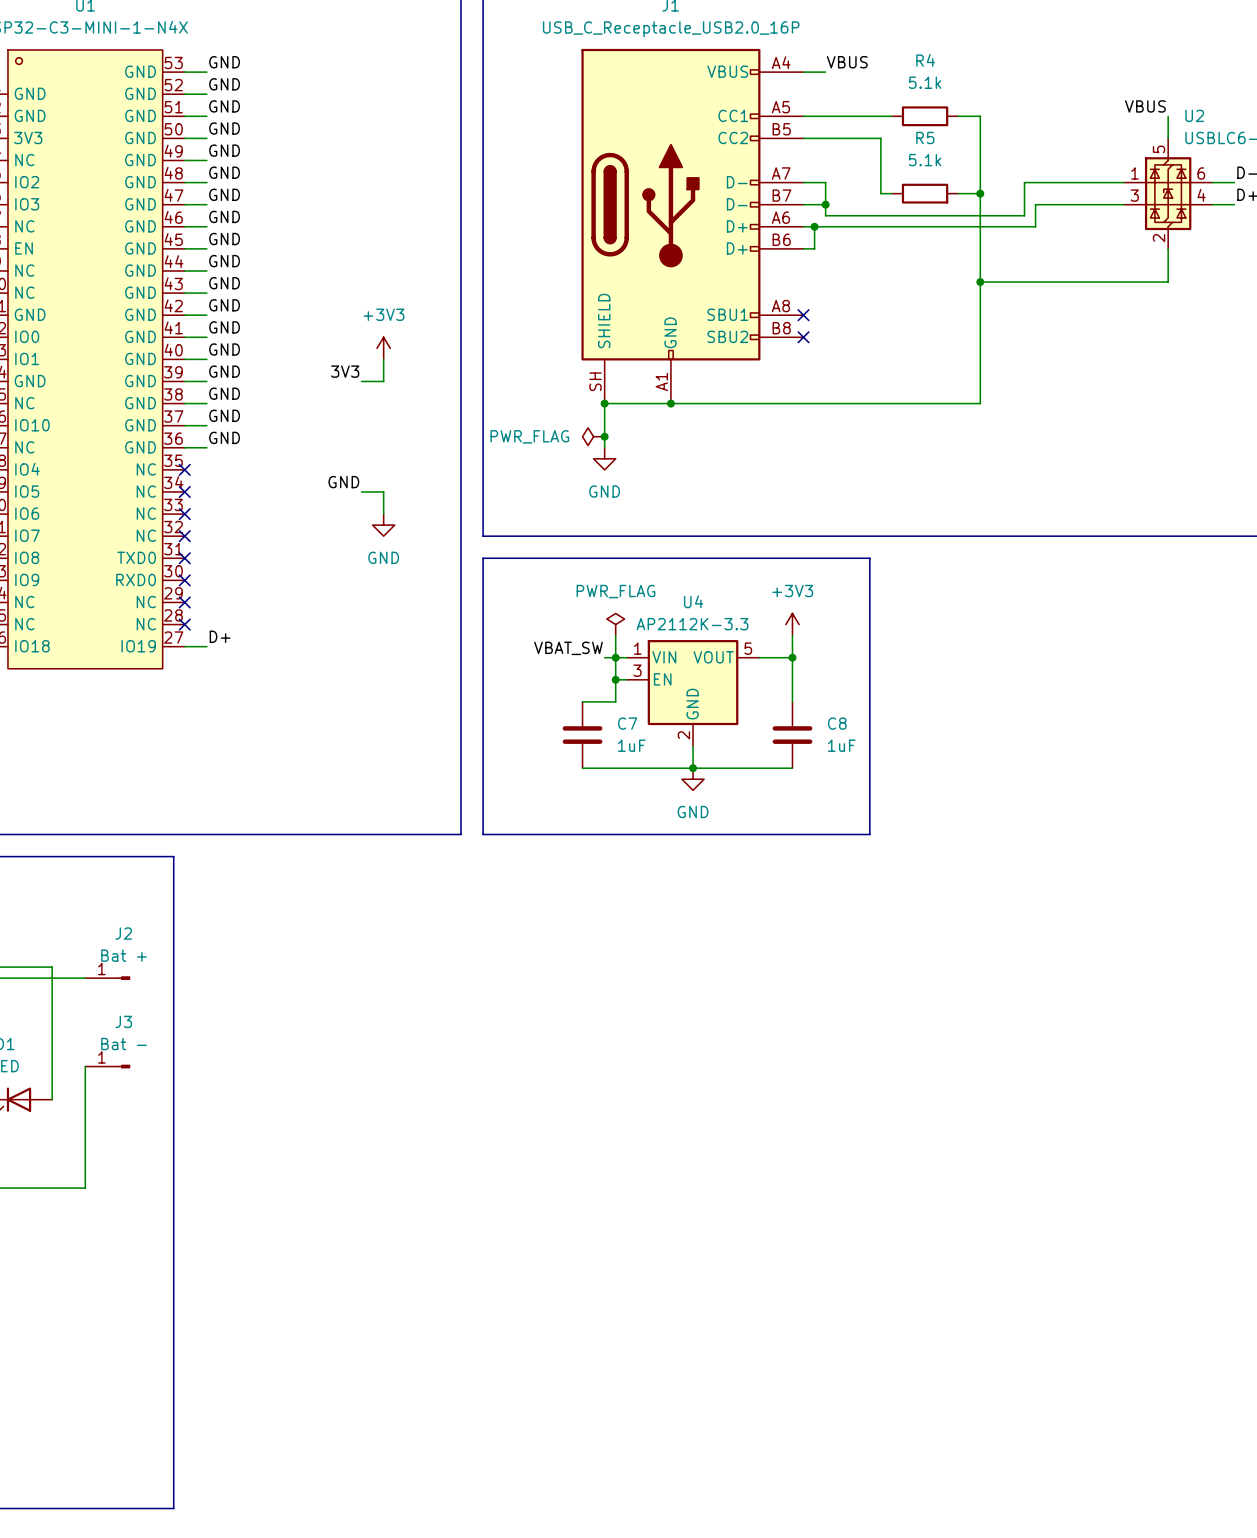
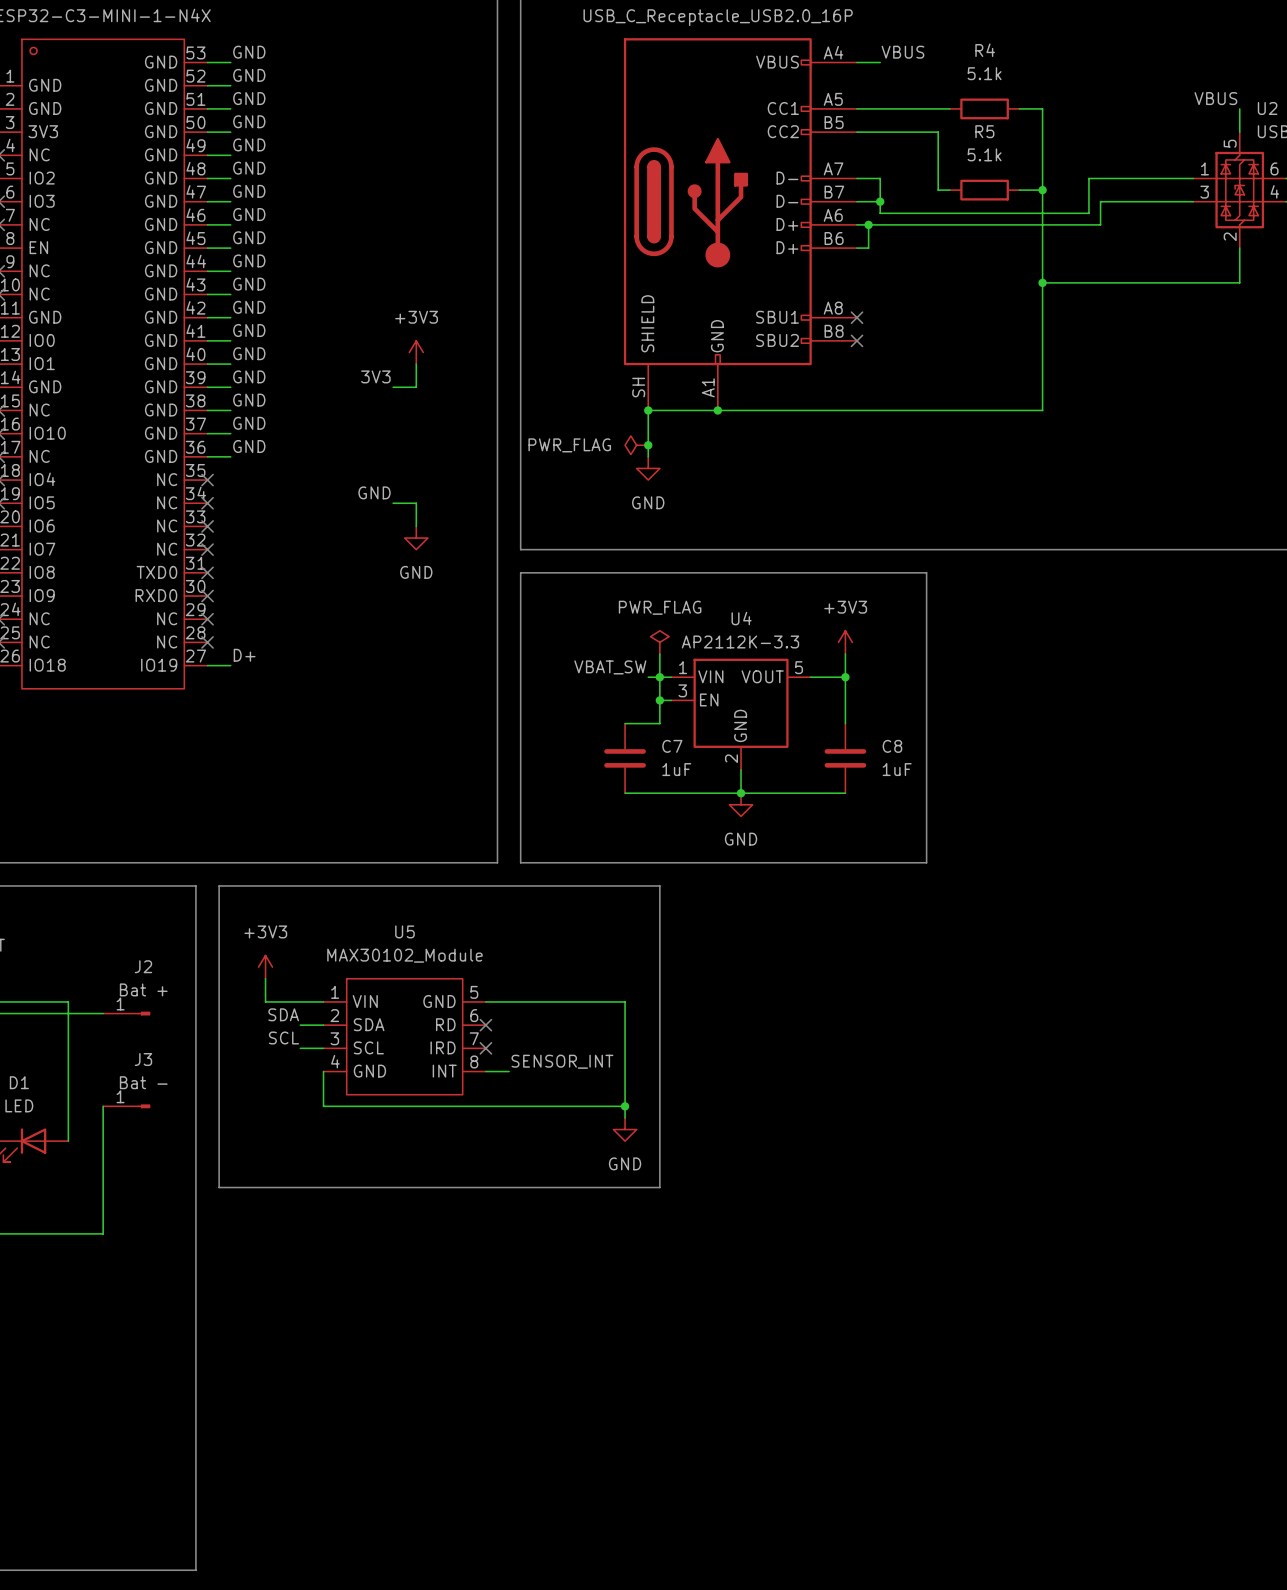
line: none -> (219, 885) (659, 885) (659, 1187) (219, 1187) (219, 885)
power symbol: none -> +3V3 (265, 967)
wire: none -> (265, 978) (265, 1001) (323, 1001)
wire: none -> (485, 1001) (625, 1001) (625, 1117)
label: none -> SDA (283, 1014)
wire: none -> (300, 1025) (323, 1025)
no-connect mark: none -> (485, 1025)
U5: none -> MAX30102_Module (404, 1036)
label: none -> SCL (283, 1037)
wire: none -> (300, 1048) (323, 1048)
no-connect mark: none -> (485, 1048)
label: none -> SENSOR_INT (562, 1061)
wire: none -> (323, 1071) (323, 1106) (625, 1106)
wire: none -> (485, 1071) (509, 1071)
junction: none -> (625, 1106)
power symbol: none -> GND (625, 1129)

